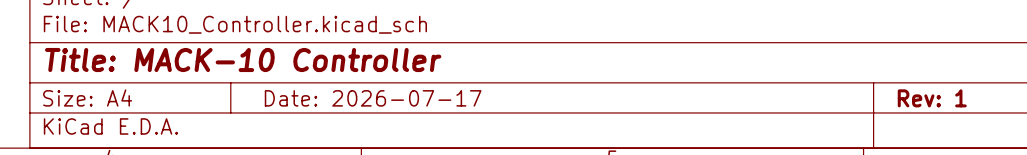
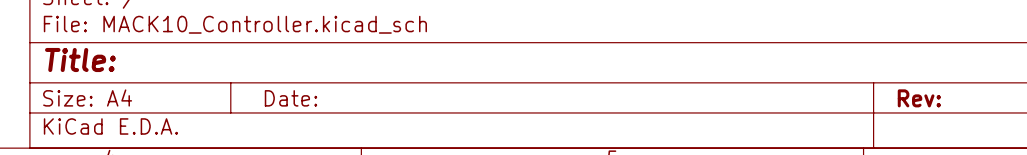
title block: Title: MACK-10 Controller (243, 60) -> Title: (80, 60)
title block: Date: 2026-07-17 (373, 98) -> Date: (290, 98)
title block: Rev: 1 (932, 98) -> Rev: (919, 98)

